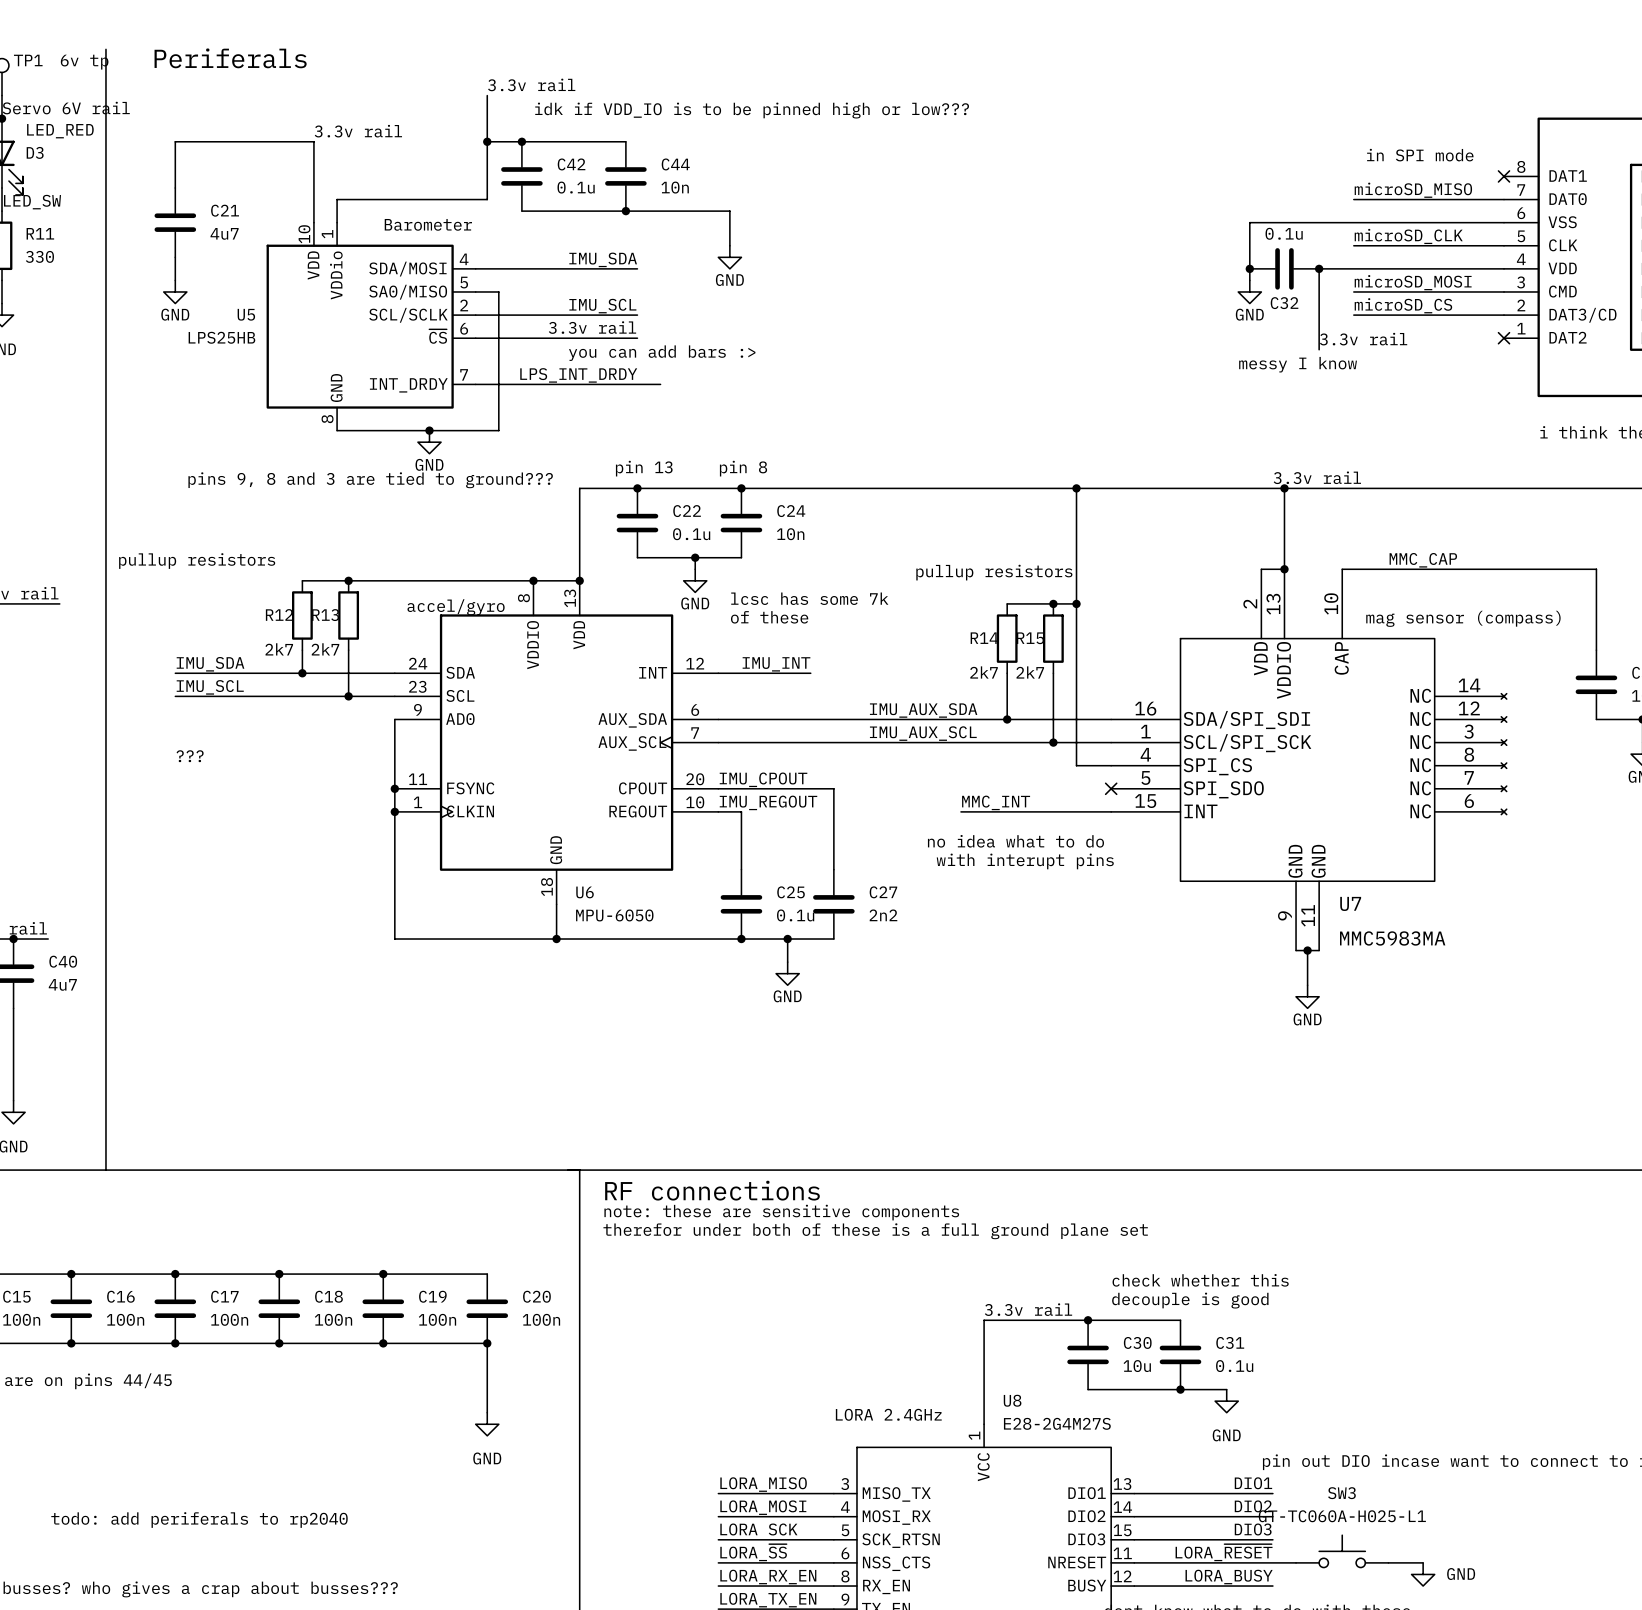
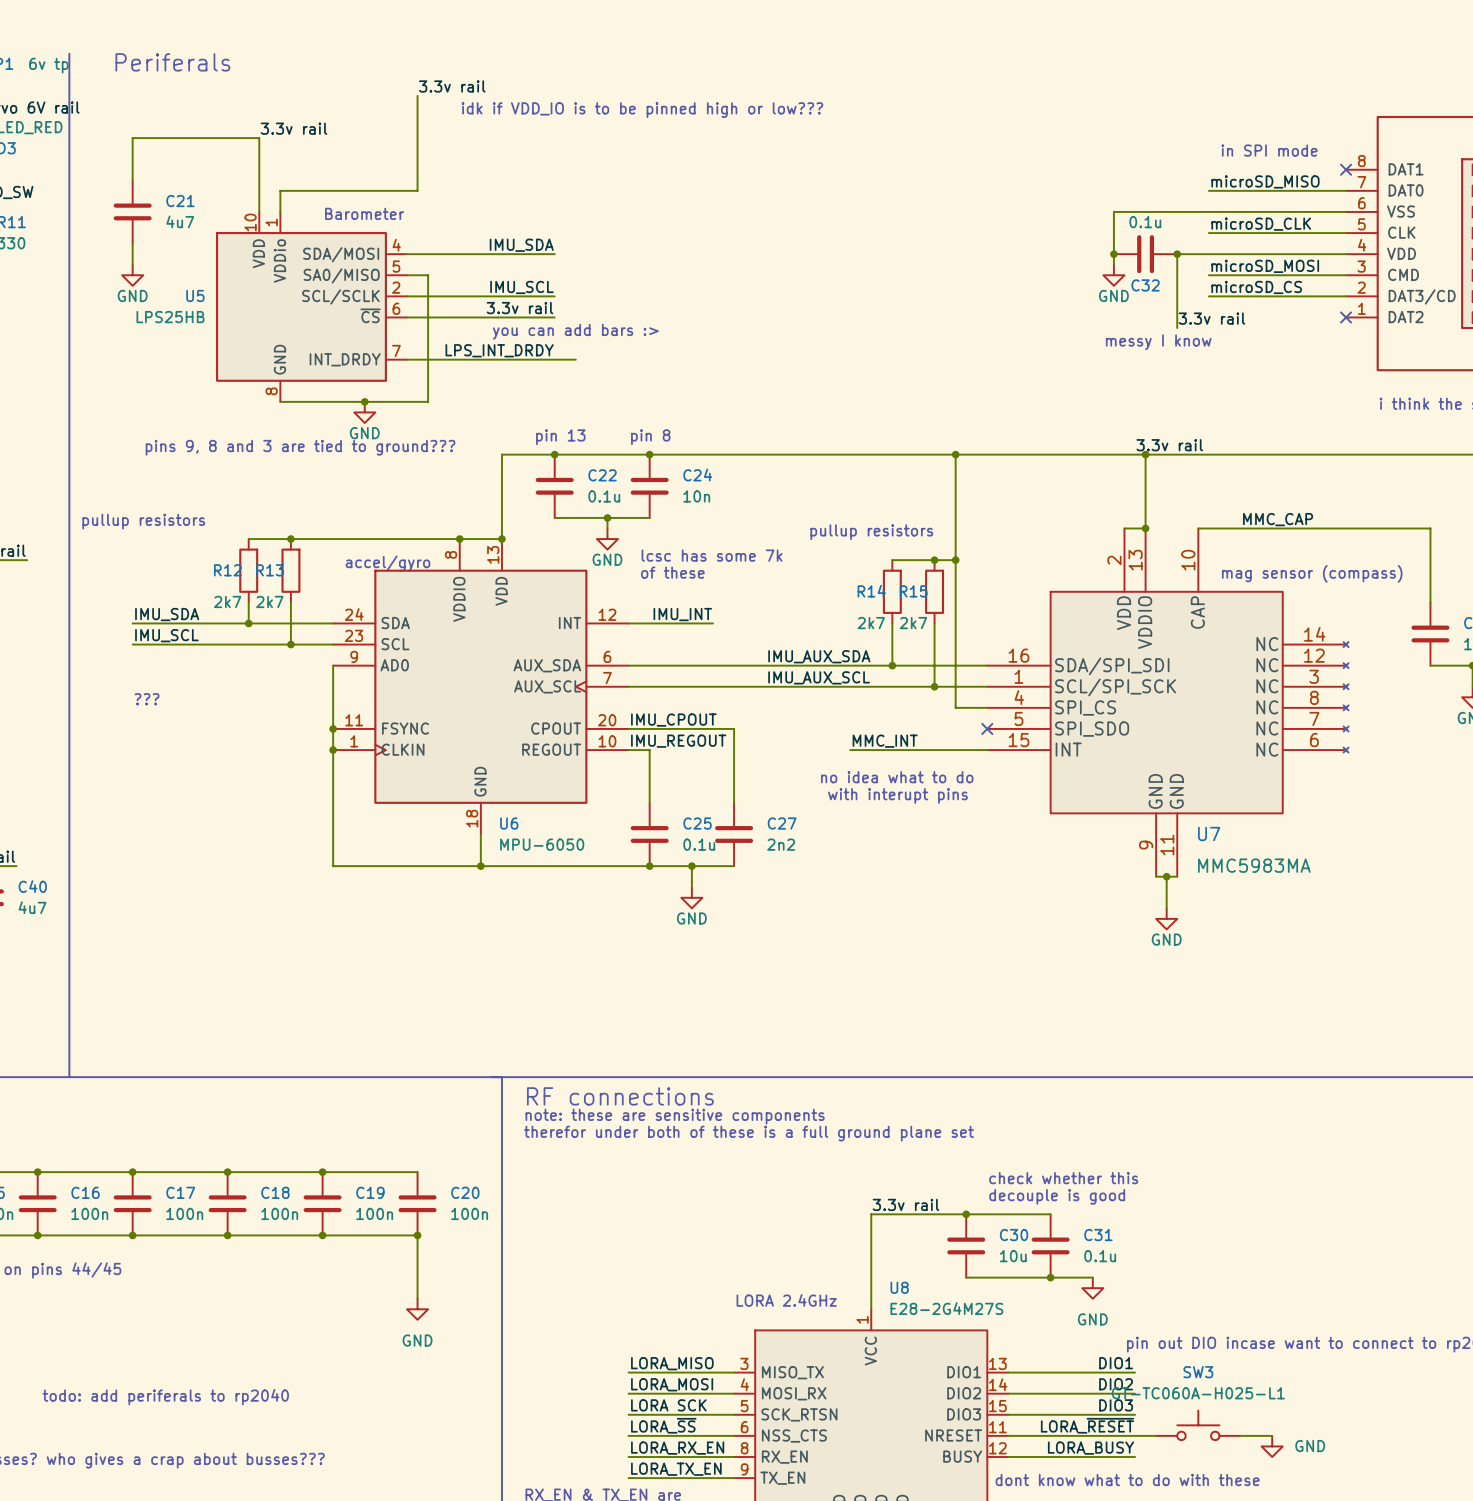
wire: (487, 141) (625, 141) -> none
junction: (487, 141) -> none
junction: (521, 141) -> none
C42: 0.1u (521, 176) -> none
C44: 10n (625, 176) -> none
wire: (521, 211) (729, 211) (729, 245) -> none
junction: (625, 211) -> none
power symbol: GND (729, 257) -> none

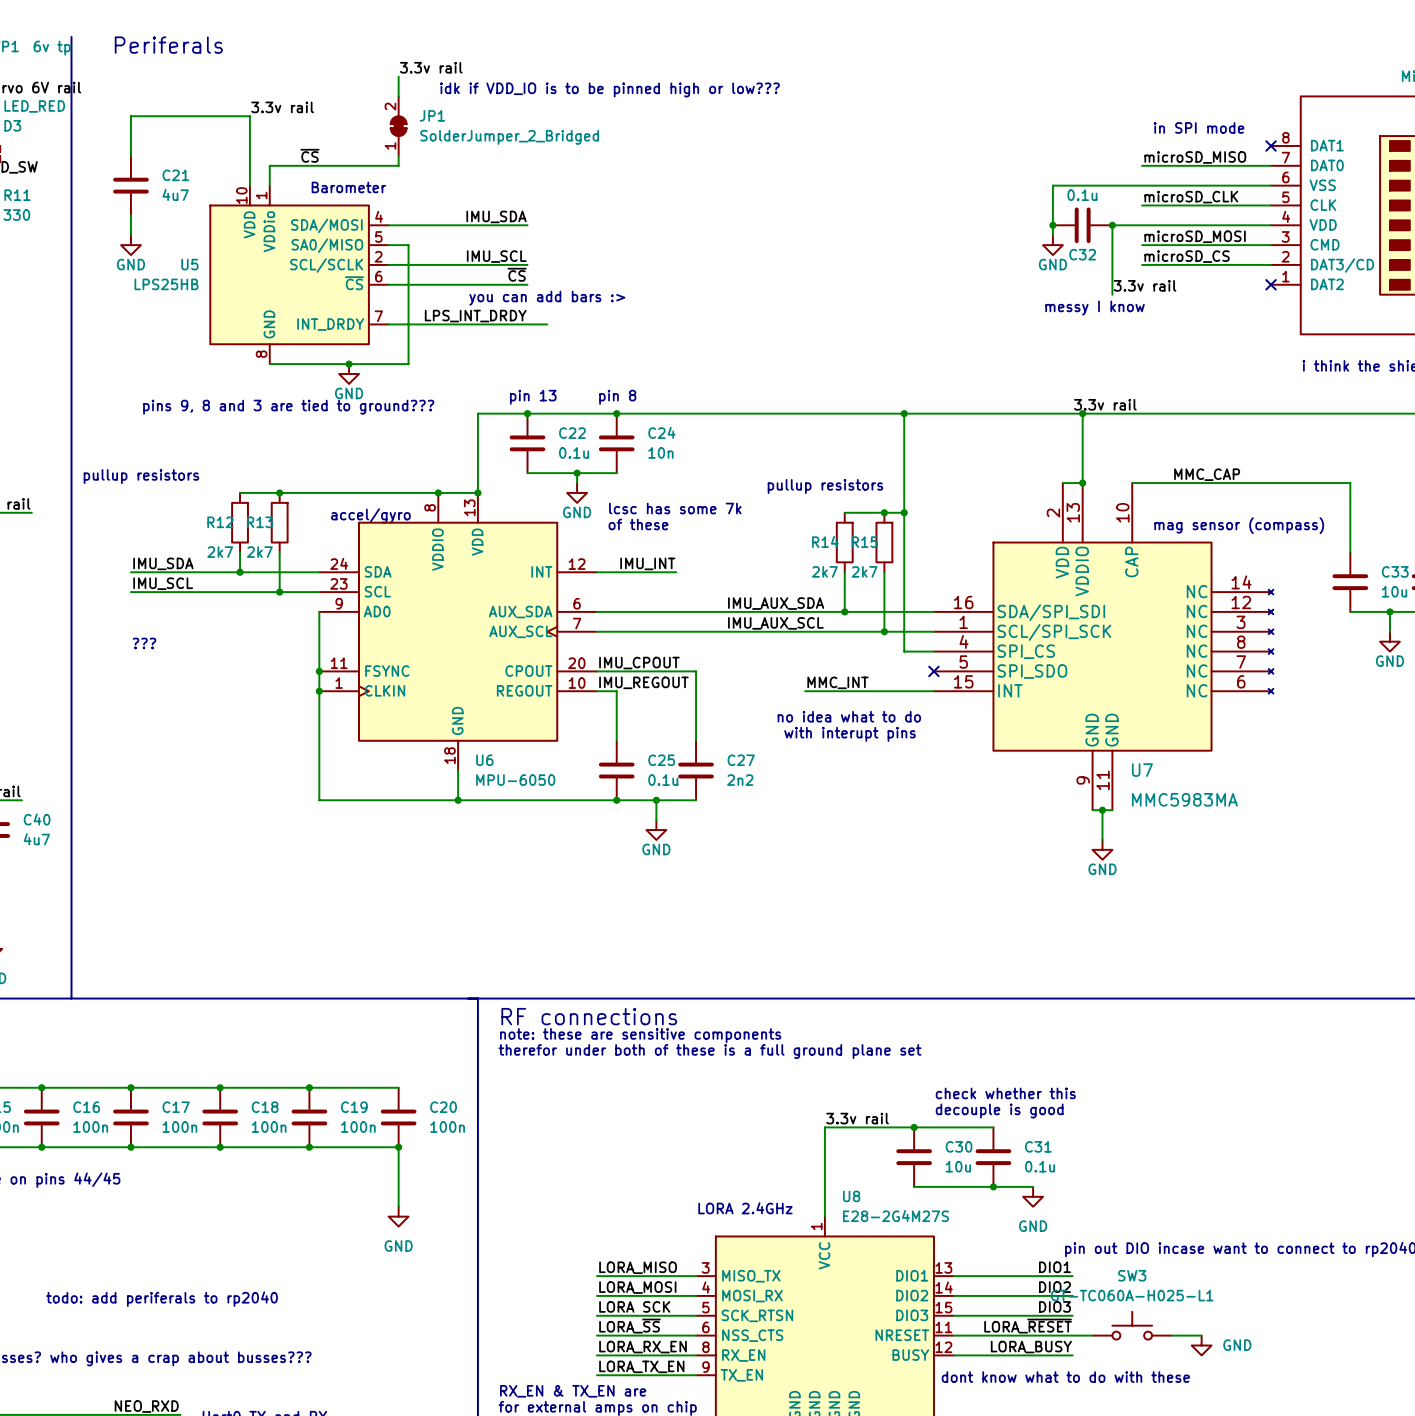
JP1: none -> SolderJumper_2_Bridged (398, 126)
label: none -> ~{CS} (309, 155)
label: 3.3v rail (519, 308) -> ~{CS} (517, 274)

